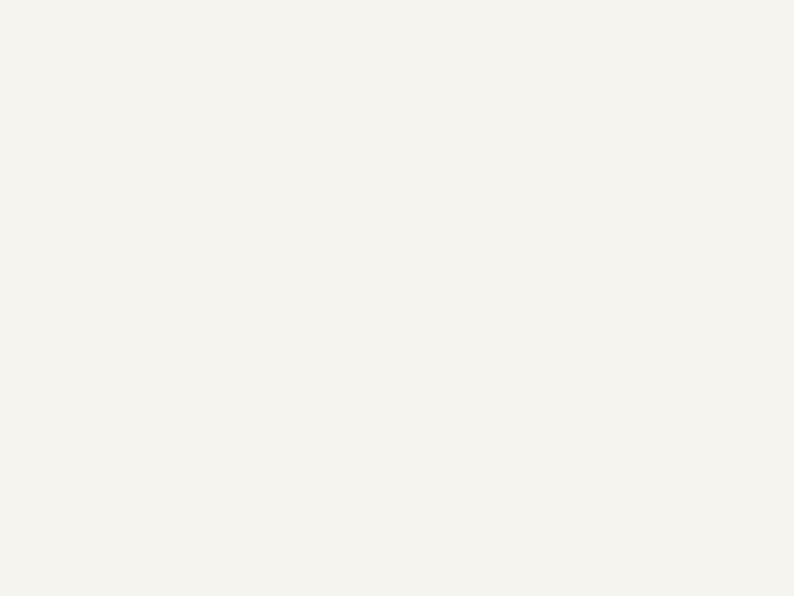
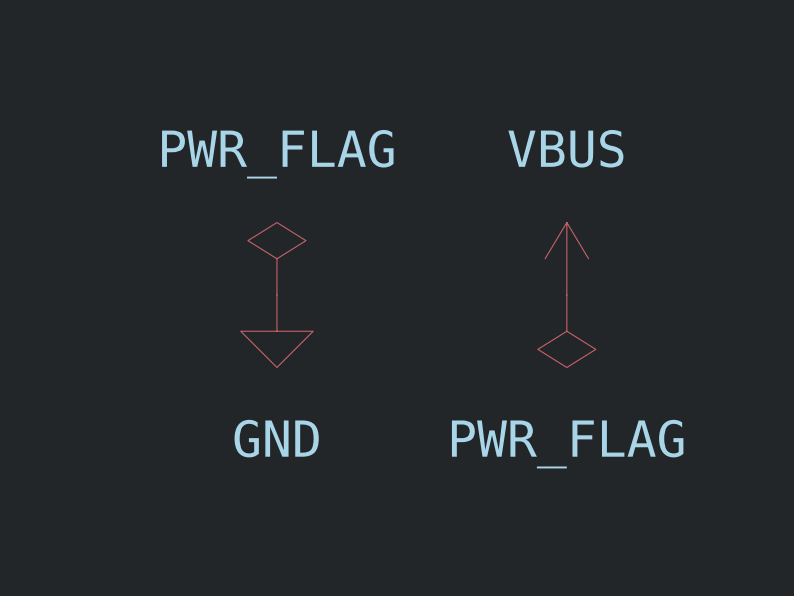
power symbol: none -> PWR_FLAG (276, 258)
power symbol: none -> VBUS (566, 258)
power symbol: none -> GND (276, 331)
power symbol: none -> PWR_FLAG (566, 331)

